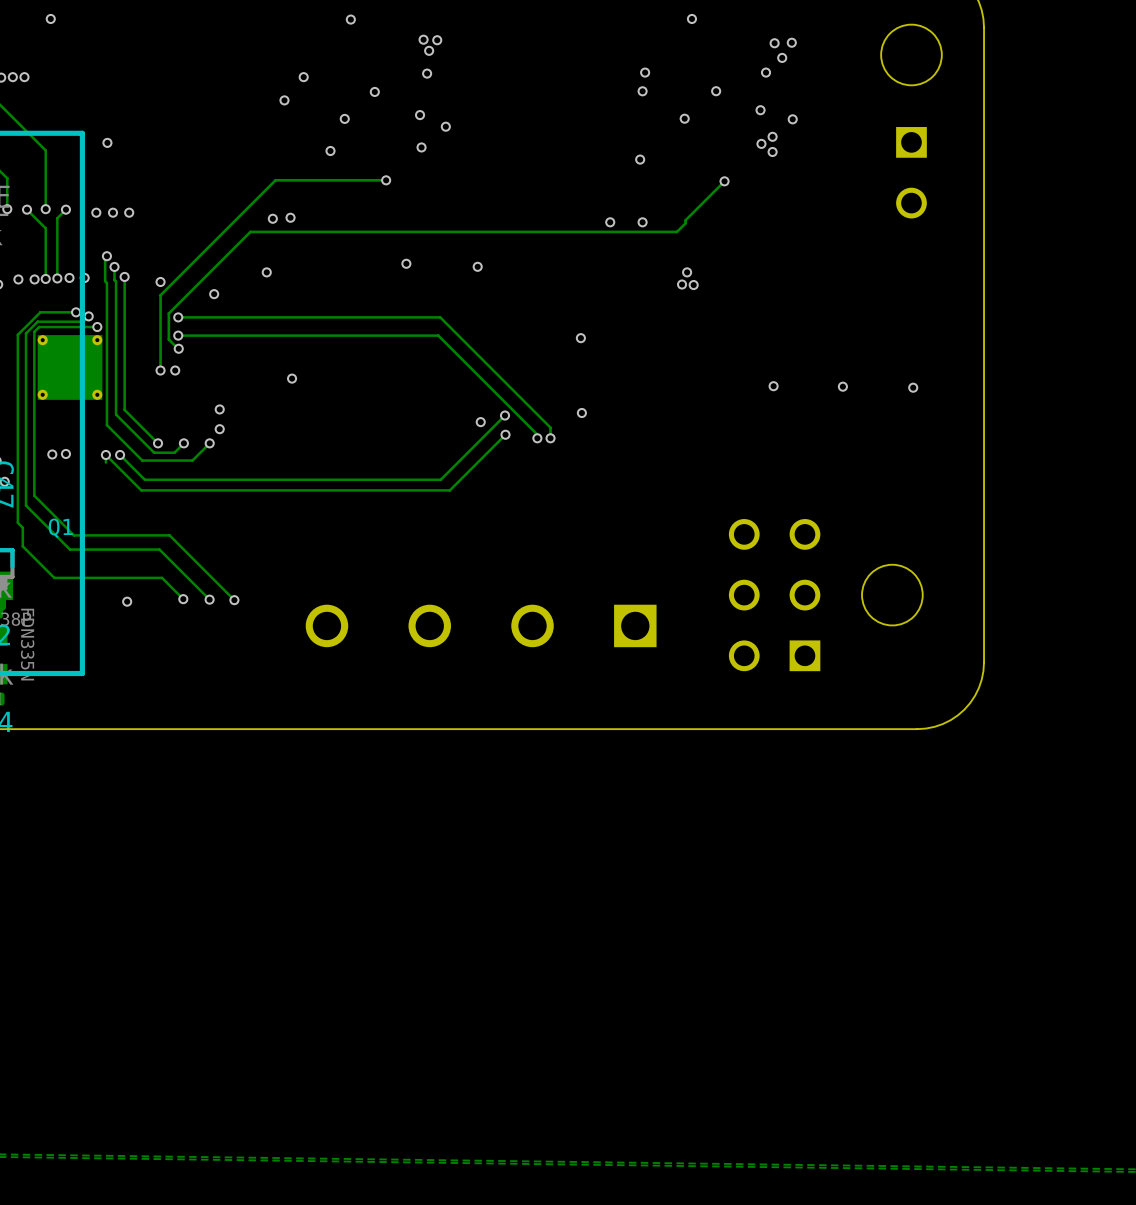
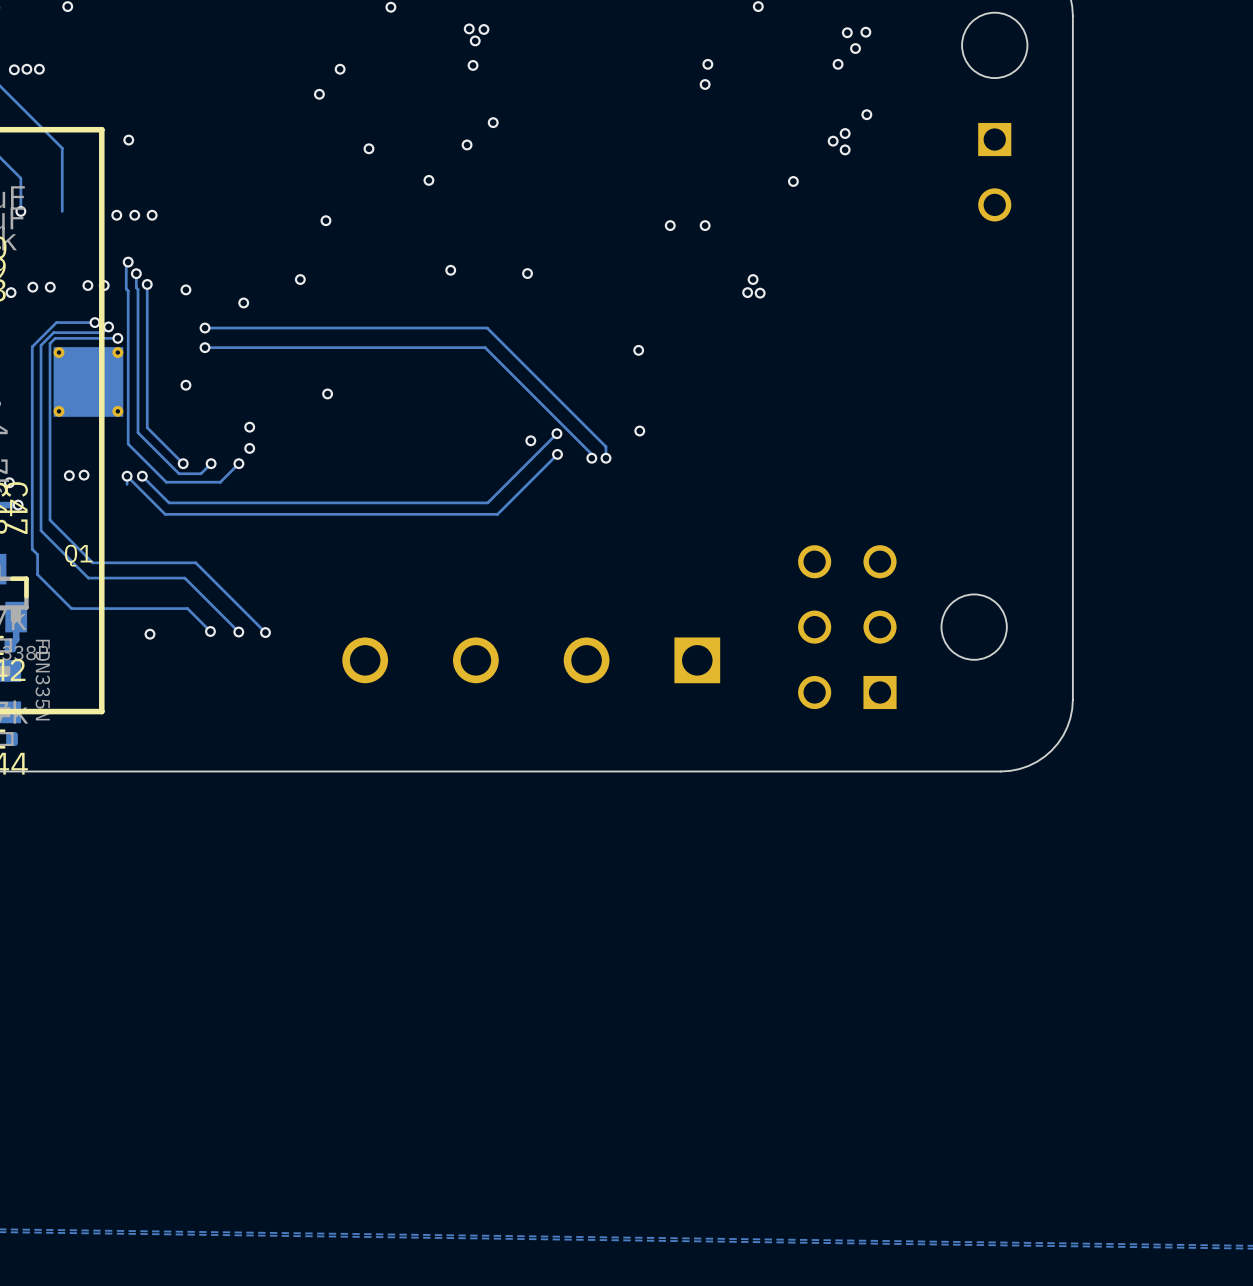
via: (374, 91) -> none
via: (716, 91) -> none
via: (760, 110) -> none
via: (420, 115) -> none
via: (344, 118) -> none
via: (684, 118) -> none
via: (640, 159) -> none
track: (386, 180) (275, 180) (160, 295) (160, 370) -> none
track: (724, 181) (685, 220) (685, 223) (676, 231) (250, 231) (168, 313) (168, 339) (178, 348) -> none
track: (27, 209) (45, 228) (45, 278) -> none
via: (27, 209) -> none
via: (45, 209) -> none
track: (65, 209) (57, 218) (57, 278) -> none
via: (65, 209) -> none
via: (272, 218) -> none
via: (45, 278) -> none
via: (57, 278) -> none
via: (178, 348) -> none
via: (175, 370) -> none
via: (773, 386) -> none
via: (842, 386) -> none
via: (913, 387) -> none

